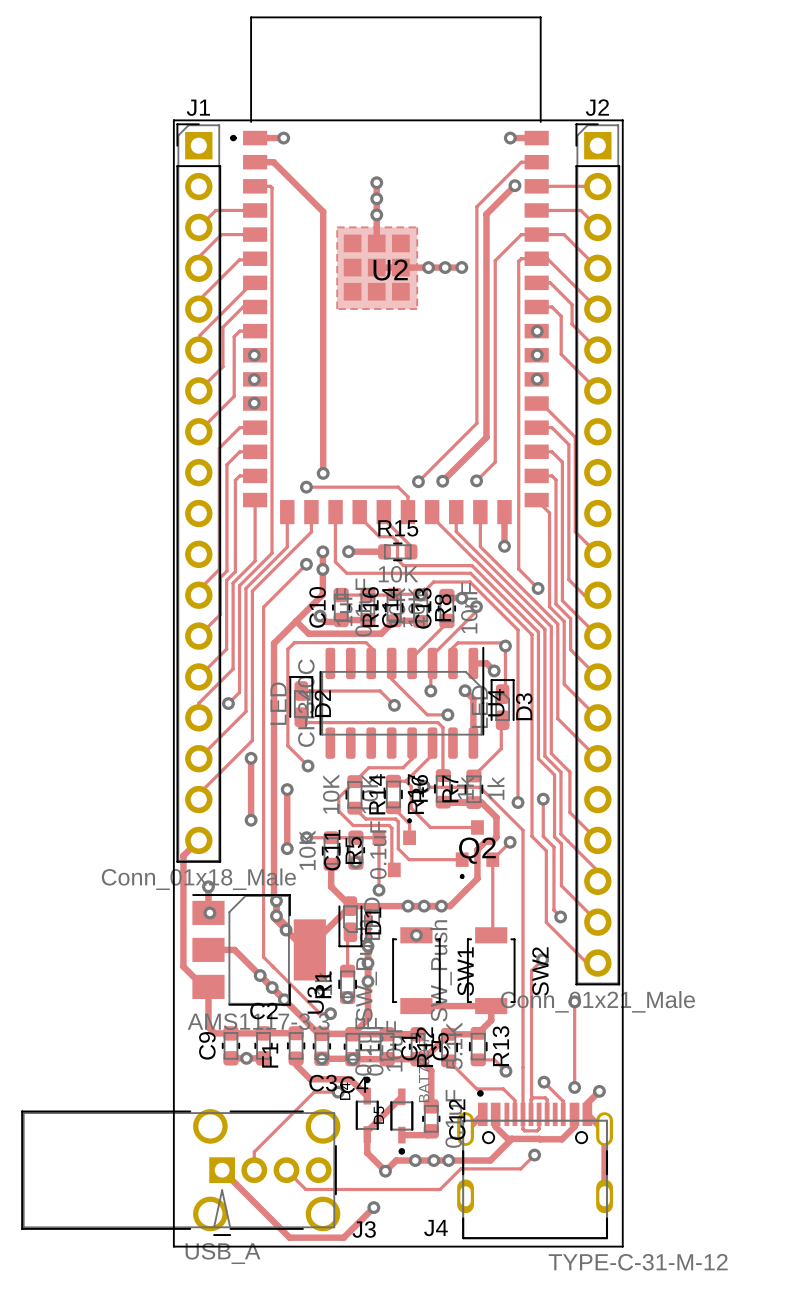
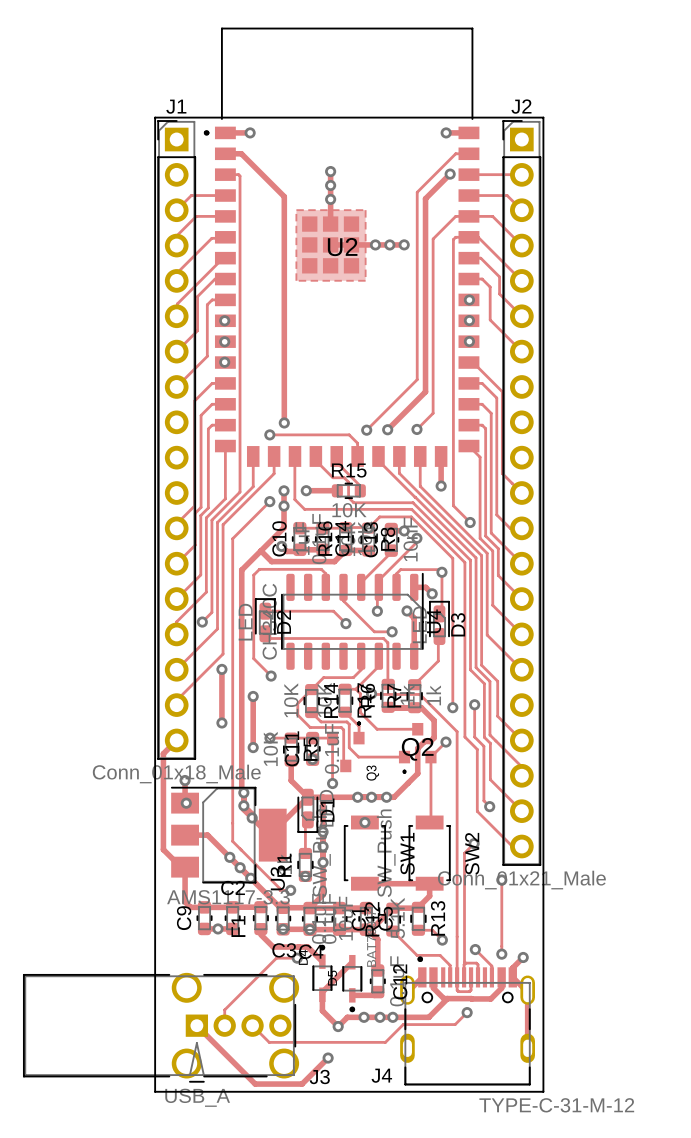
Q3 name: none -> Q3 (372, 773)

